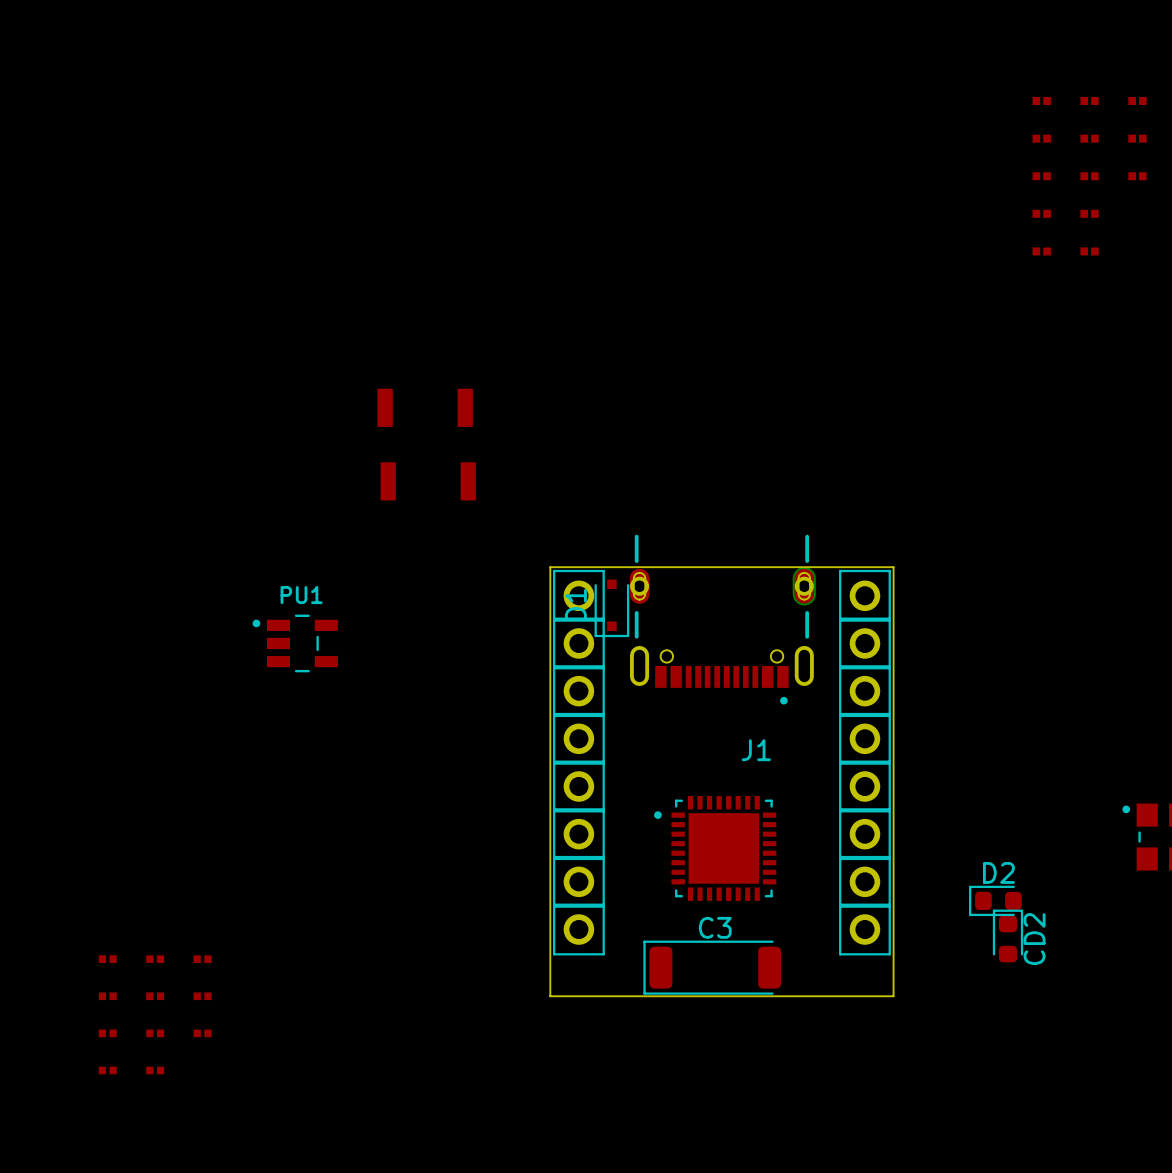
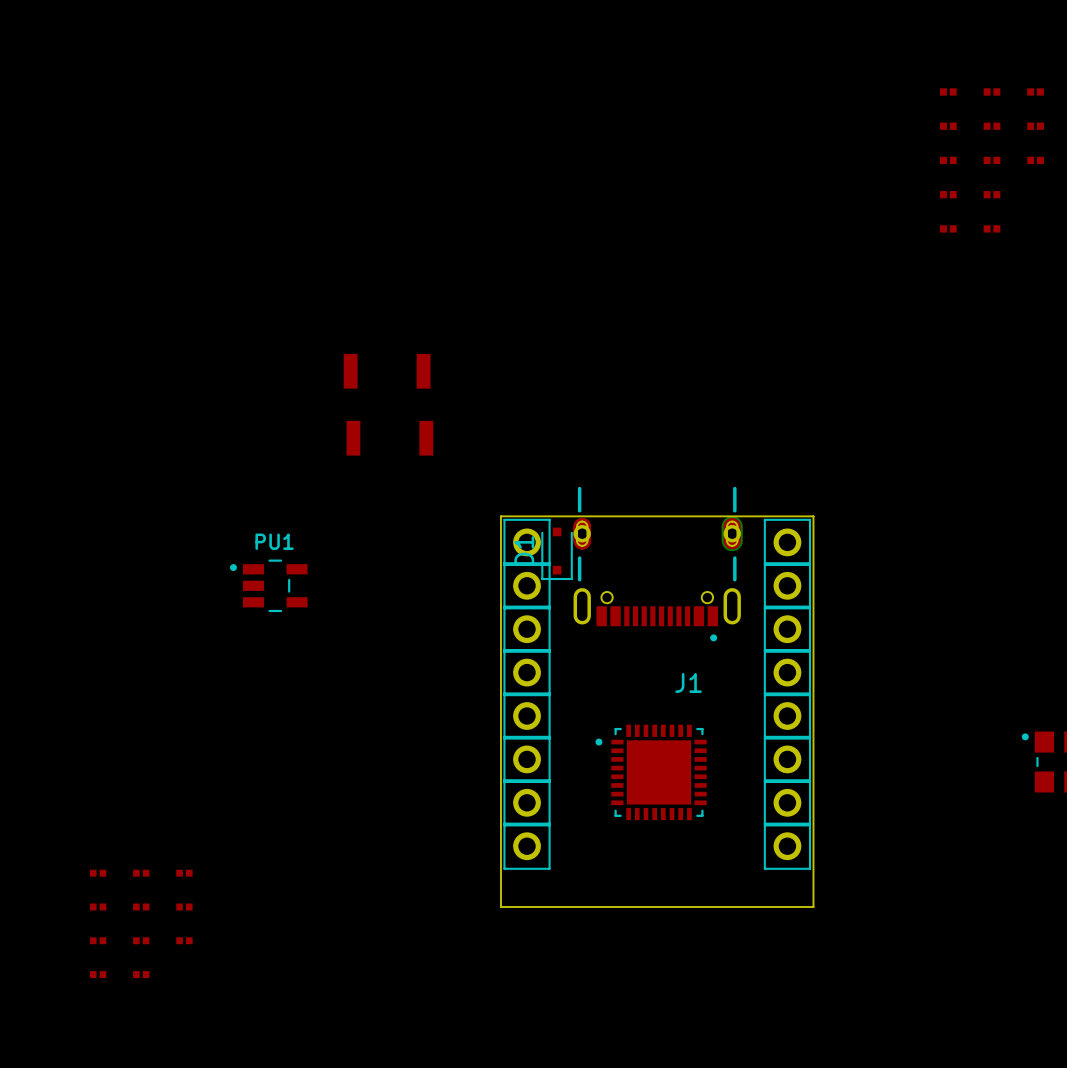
D2: (995, 900) -> none
CD2: (1007, 936) -> none
C3: (712, 967) -> none

